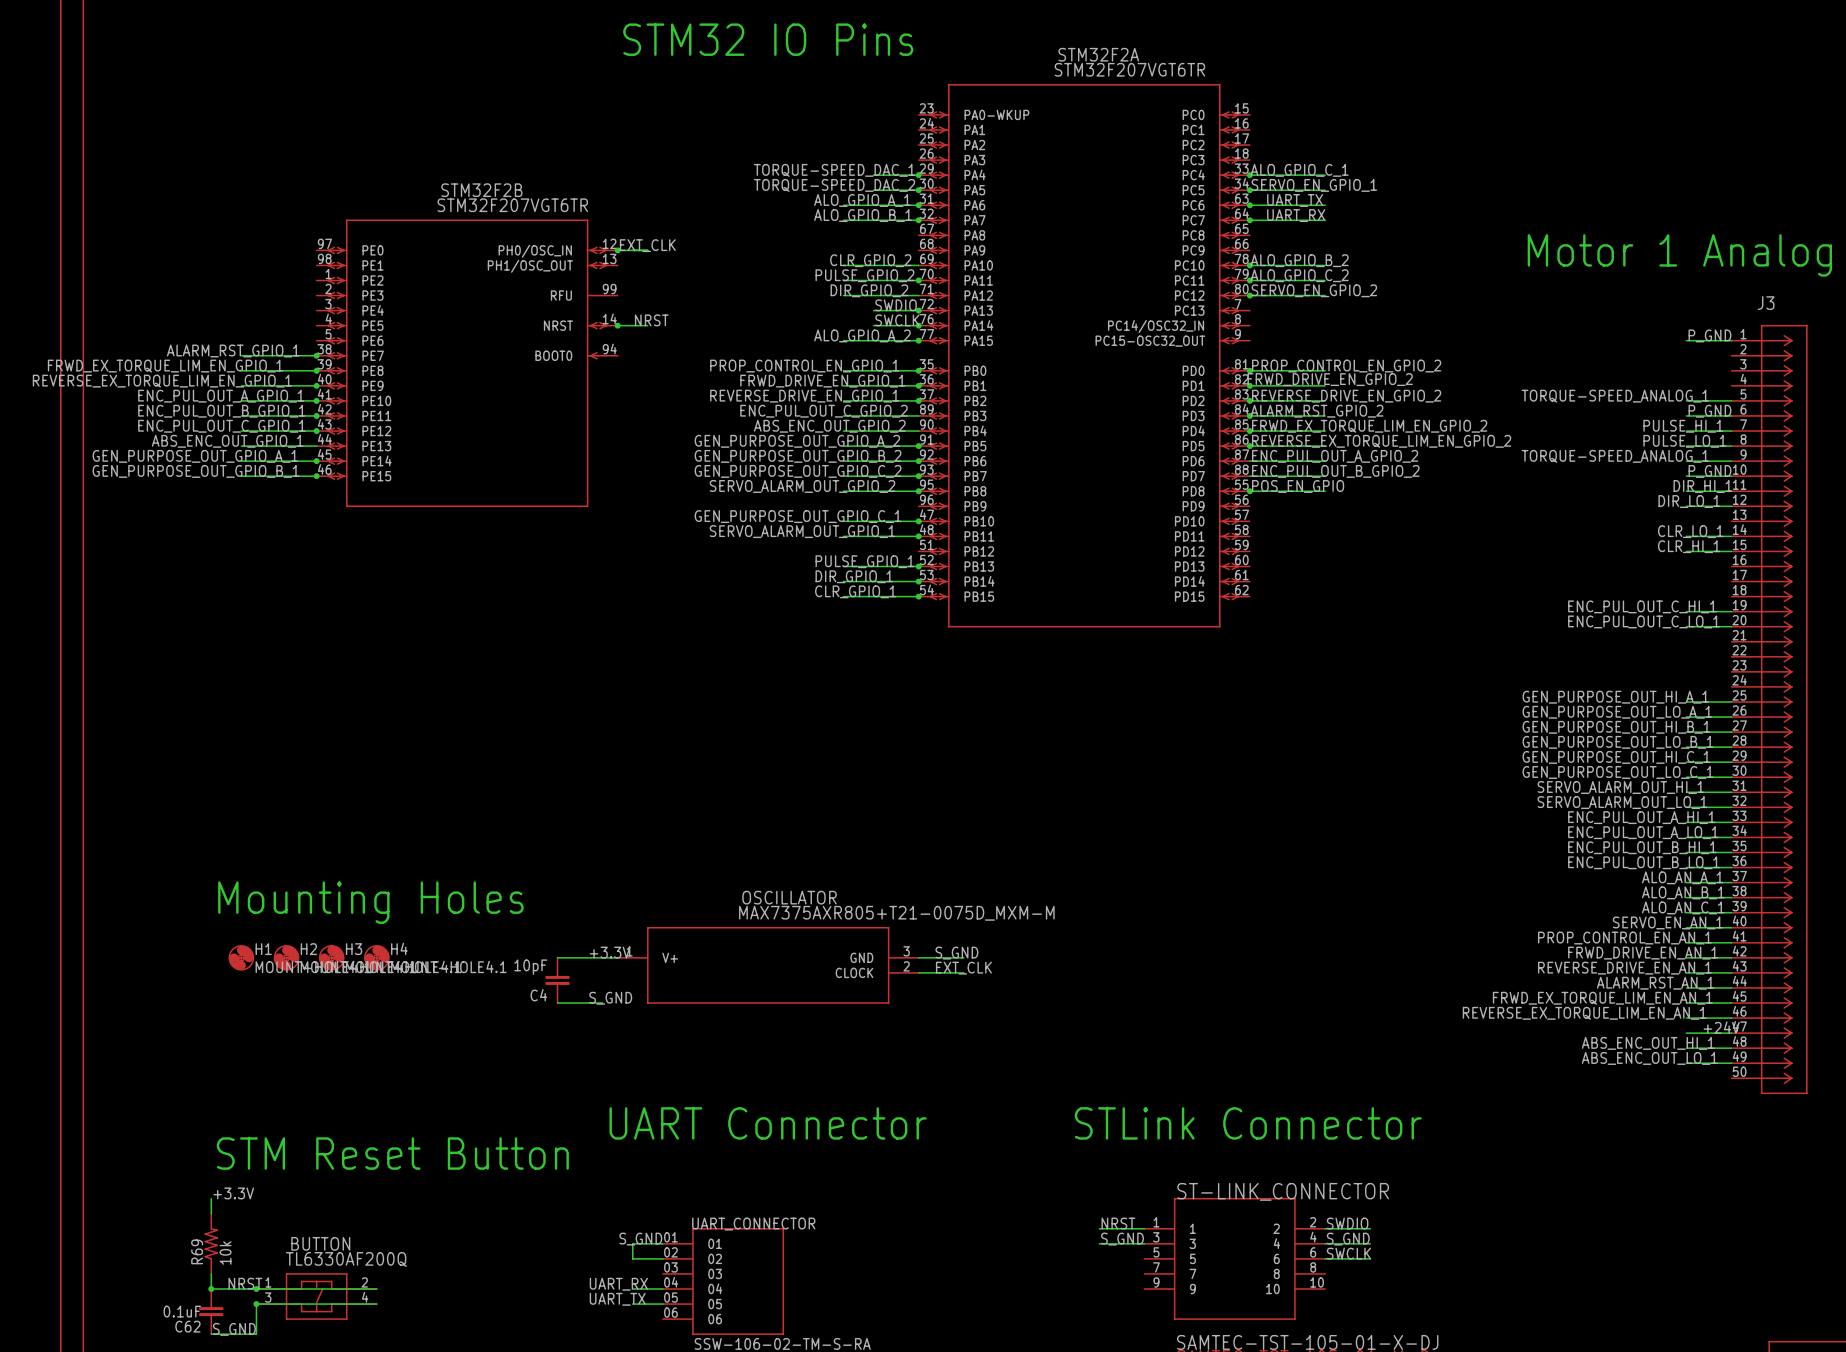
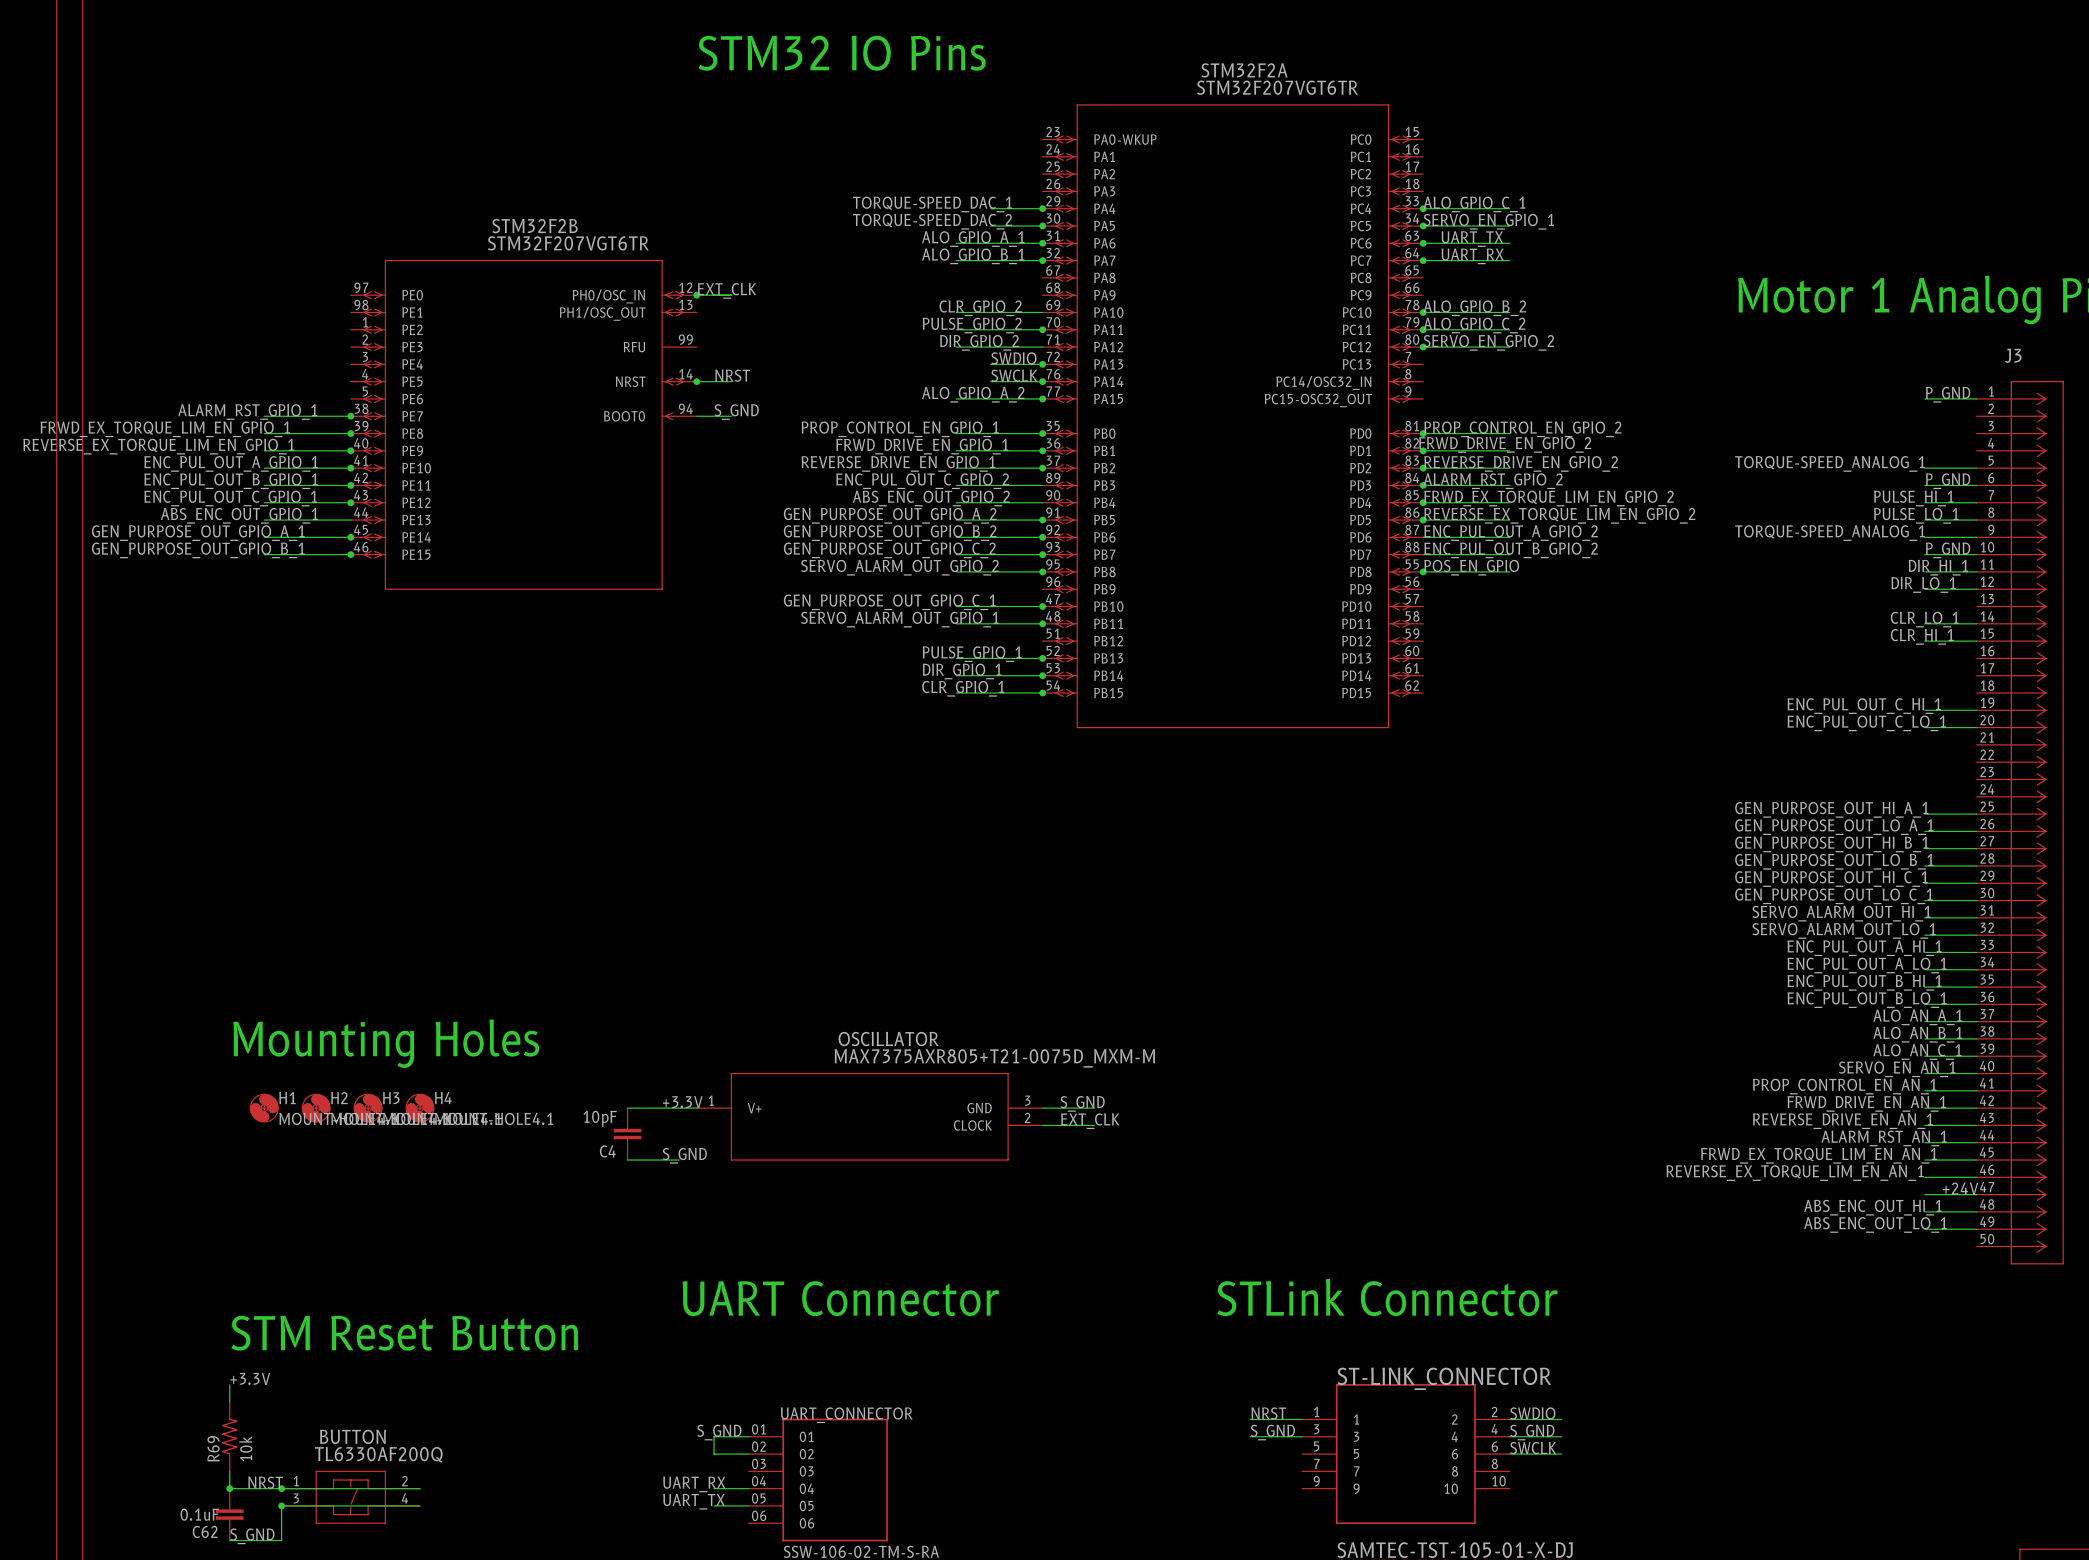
label: none -> S_GND (736, 412)
wire: none -> (696, 416) (731, 416)

